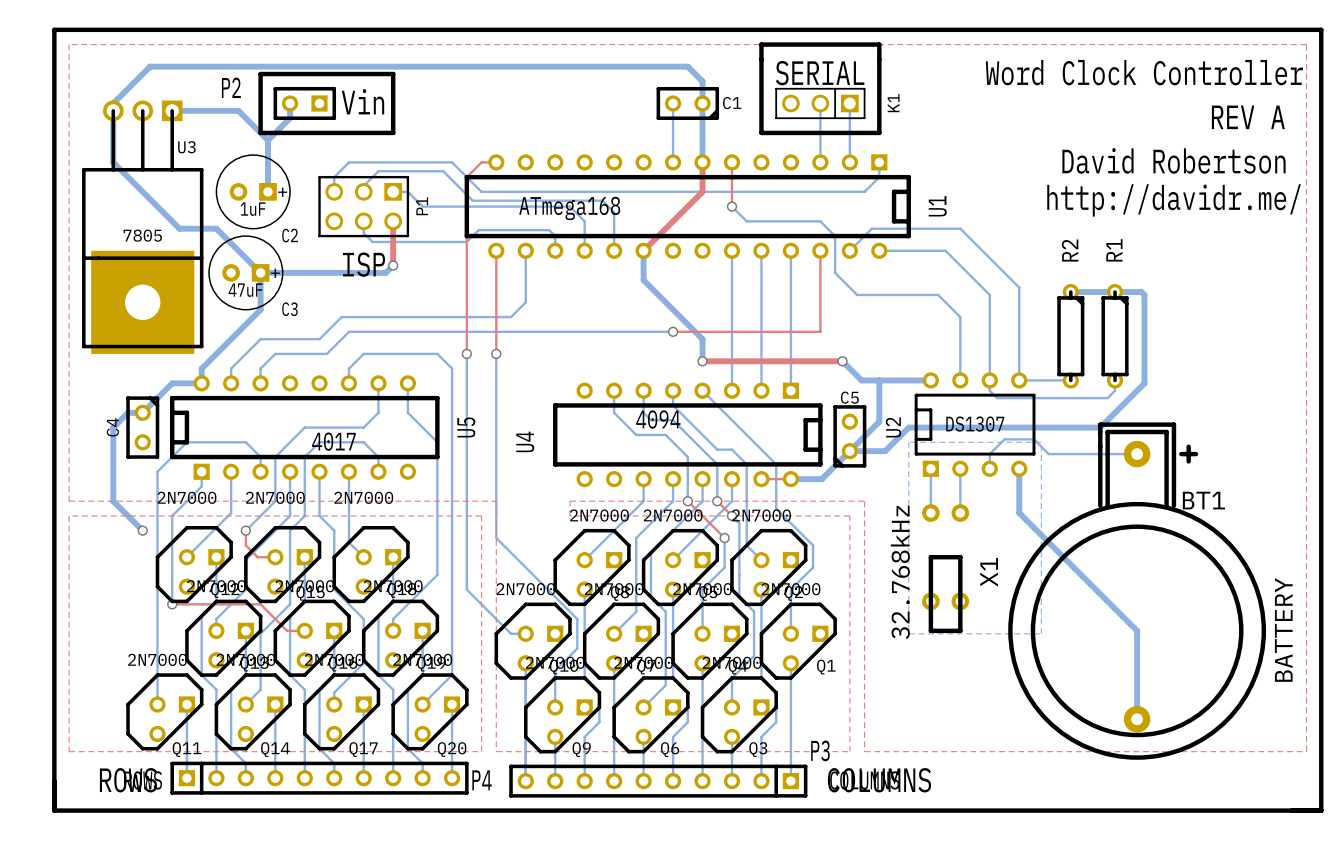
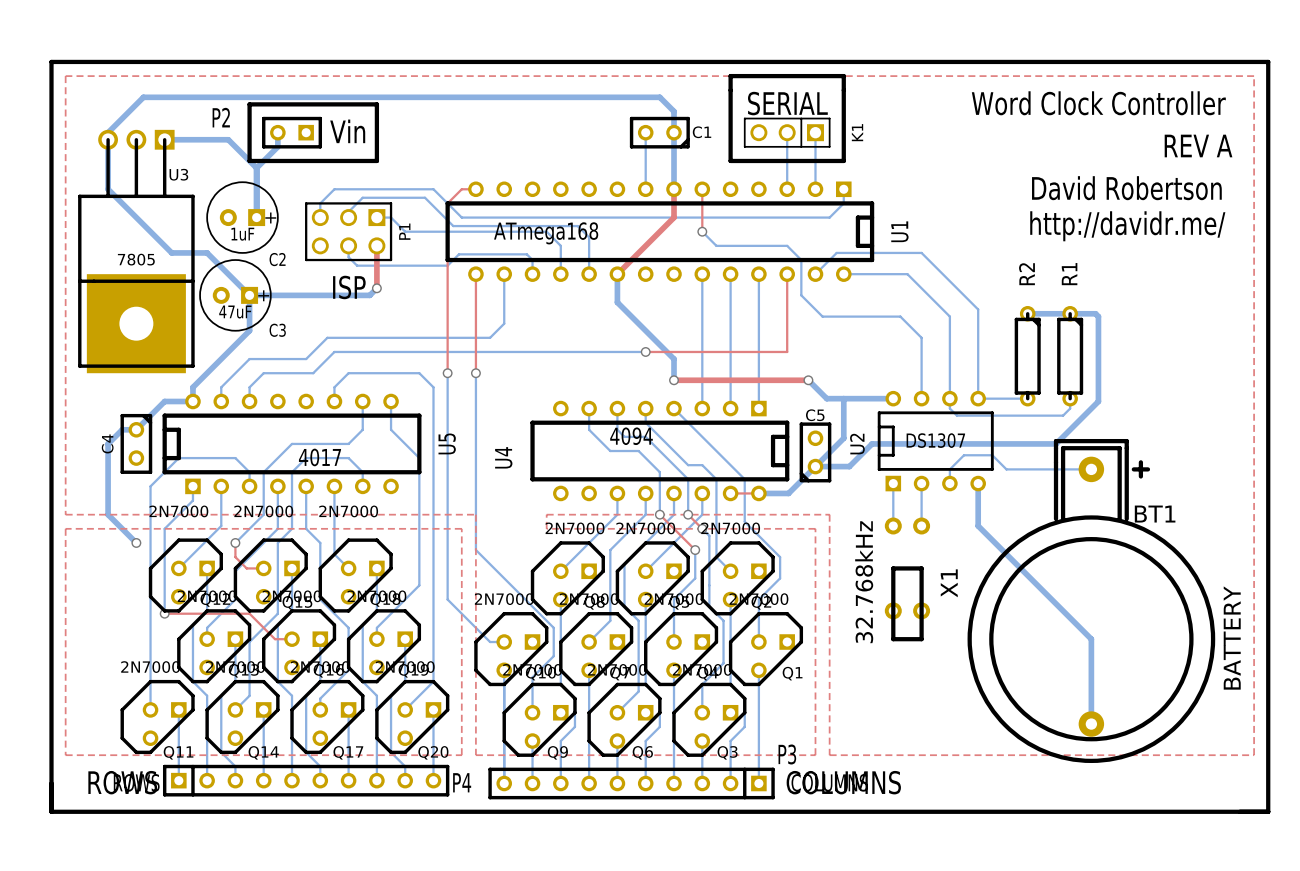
bottom zone outline: (908, 442) (1041, 442) (1041, 633) (908, 633) (908, 442) -> none

